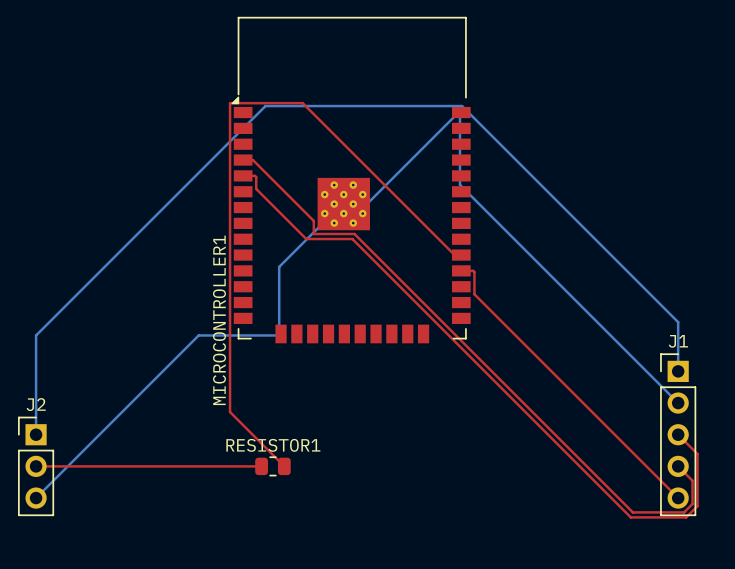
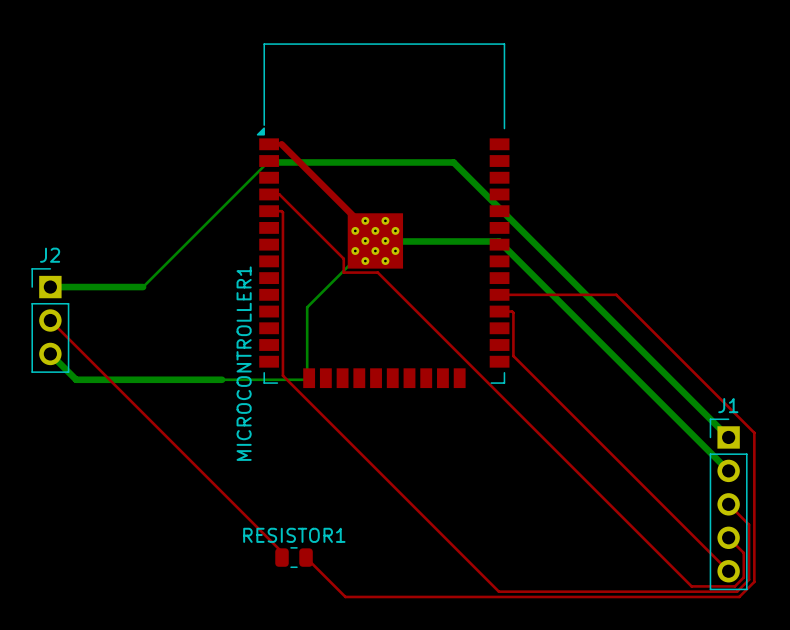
top track: none -> (269, 144) (281, 144) (375, 238) (375, 240)
bottom track: (241, 129) (265, 106) (462, 106) (678, 322) (678, 371) -> (267, 162) (453, 162) (728, 437)
top track: (256, 188) (306, 239) (352, 239) (630, 517) (686, 517) (697, 506) -> (282, 225) (282, 375) (498, 591) (737, 591) (749, 579) (749, 559)
bottom track: (366, 204) (459, 111) (459, 184) (678, 403) -> (399, 241) (499, 241) (728, 470)
top track: (346, 234) (354, 234) (632, 512) (684, 512) (692, 504) -> (377, 272) (691, 586) (734, 586) (743, 577) (743, 557)
bottom track: (123, 247) (36, 335) (36, 434) -> (143, 287) (50, 287)
top track: (461, 255) (454, 255) (302, 103) (230, 103) (230, 412) (284, 466) -> (499, 294) (616, 294) (754, 432) (754, 581) (739, 596) (345, 596) (306, 557)
top track: none -> (50, 320) (282, 552) (282, 557)
top track: (474, 294) (678, 498) -> (513, 336) (513, 356) (728, 571)
bottom track: (198, 335) (36, 498) -> (222, 379) (76, 379) (50, 353)
top track: (678, 434) (697, 454) (697, 472) -> (728, 504) (749, 524)
J1 position: (678, 434) -> (728, 504)
top track: (36, 466) (261, 466) -> none
J2 position: (36, 466) -> (50, 320)
RESISTOR1 position: (272, 466) -> (294, 557)
top track: (678, 466) (692, 480) (692, 499) -> (728, 537) (743, 552)

